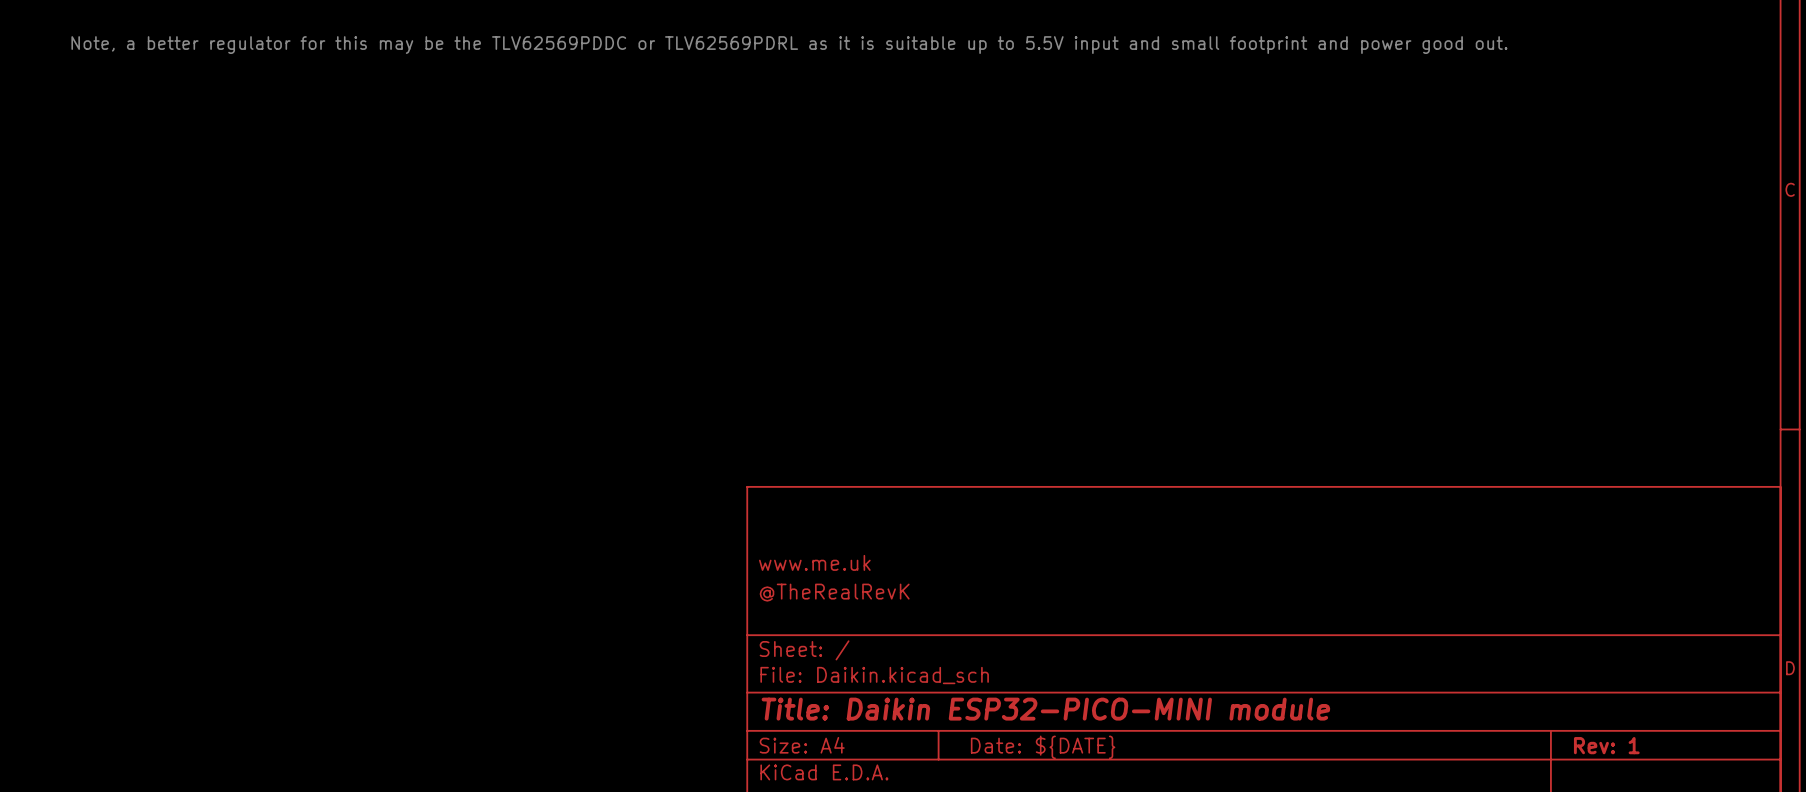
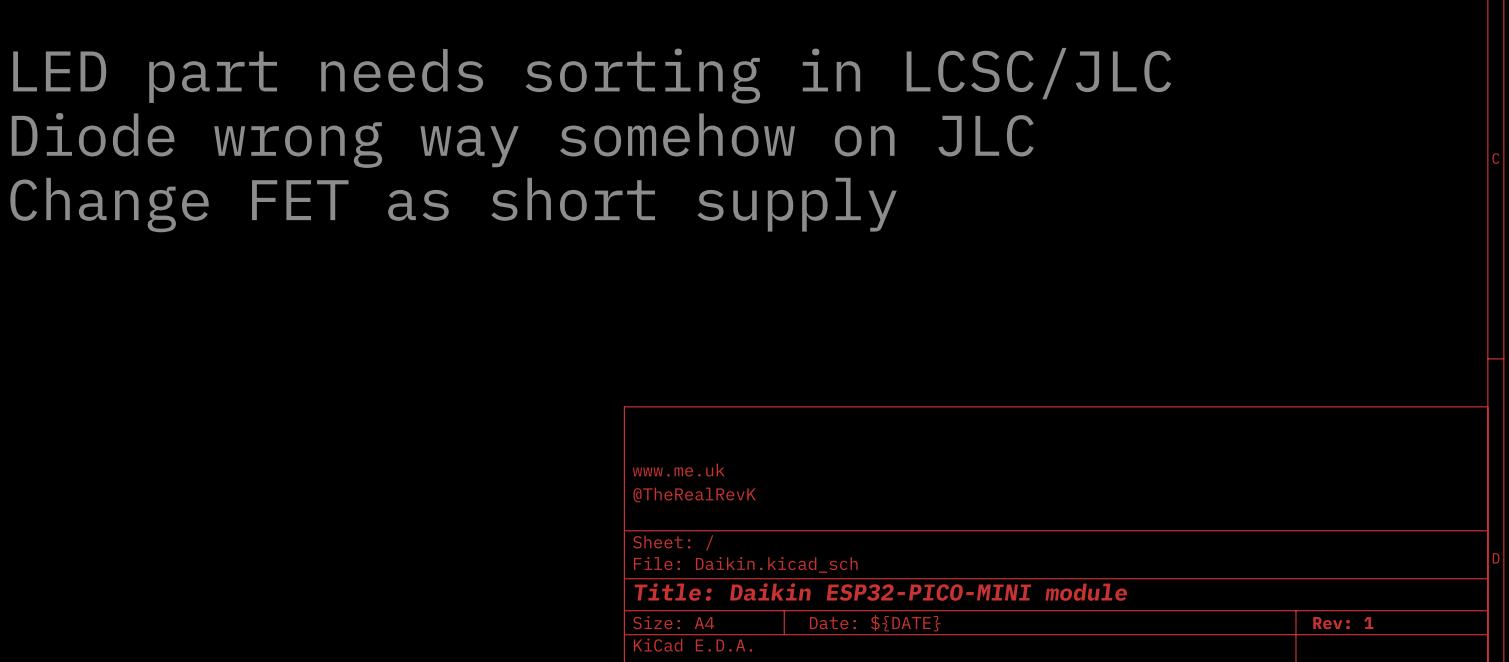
text: Note, a better regulator for this may be the TLV62569PDDC or TLV62569PDRL as it is suitable up to 5.5V input and small footprint and power good out. (789, 45) -> none
text: none -> LED part needs sorting in LCSC/JLC (592, 75)
text: none -> Diode wrong way somehow on JLC (522, 140)
text: none -> Change FET as short supply (453, 205)

